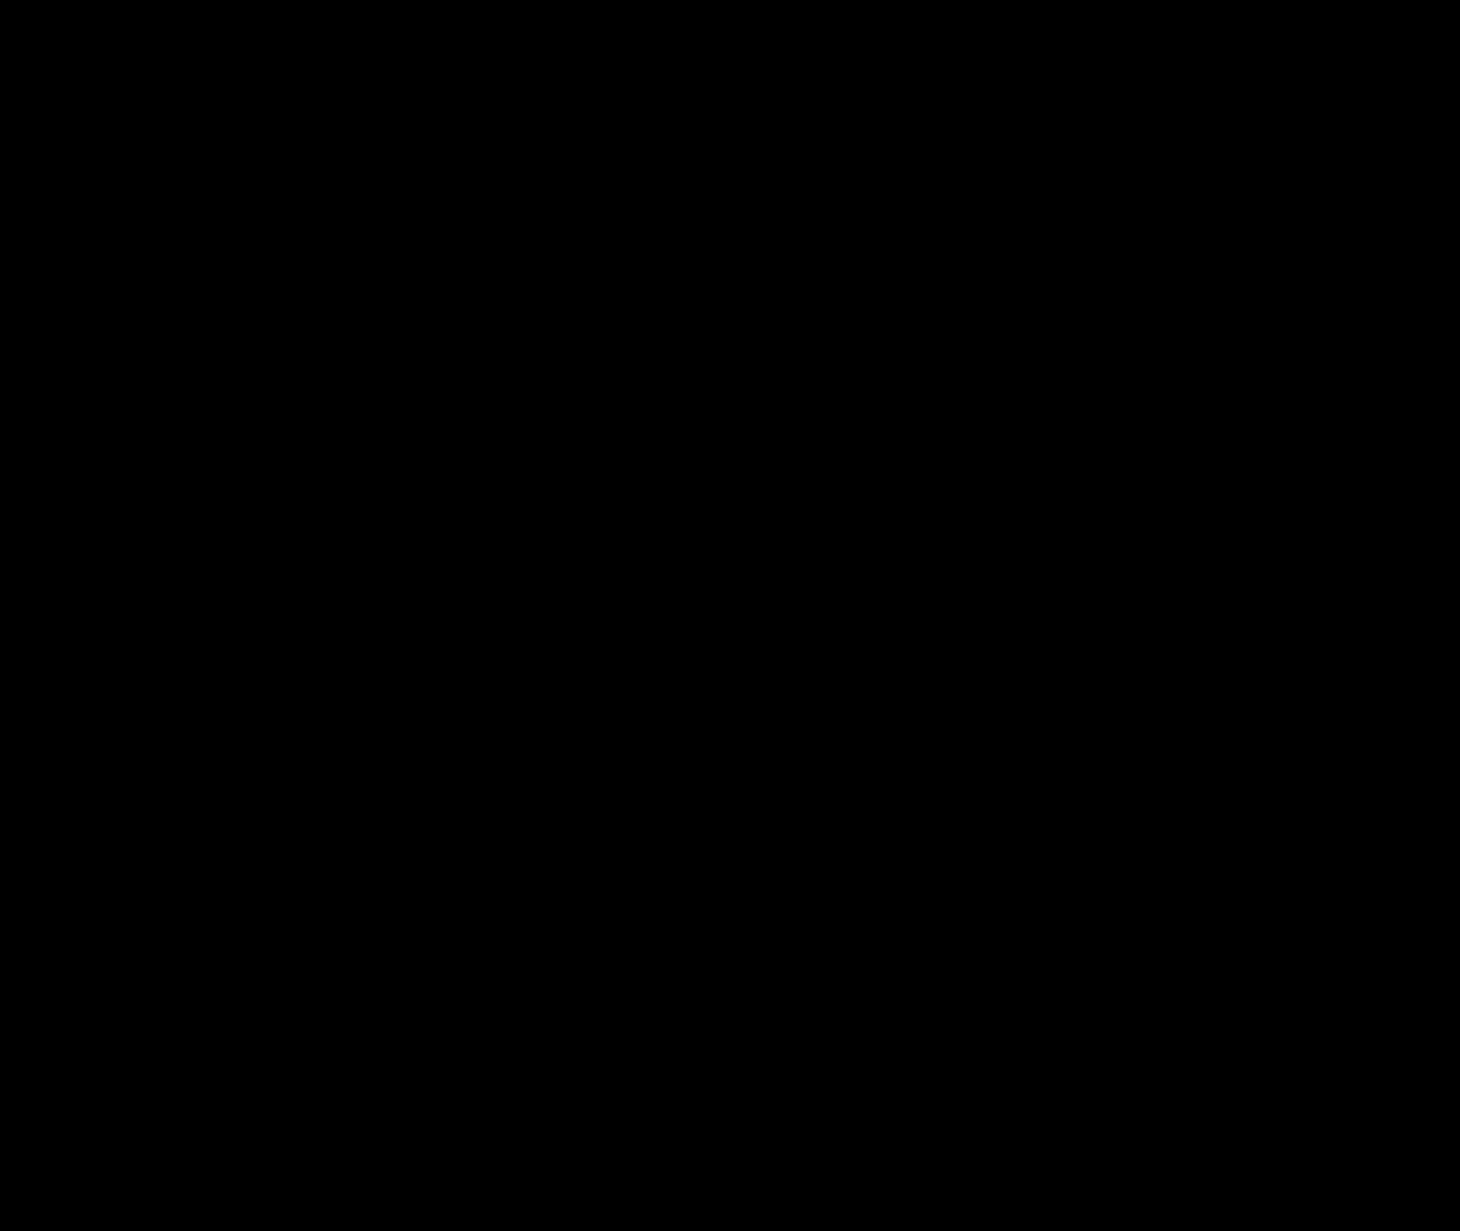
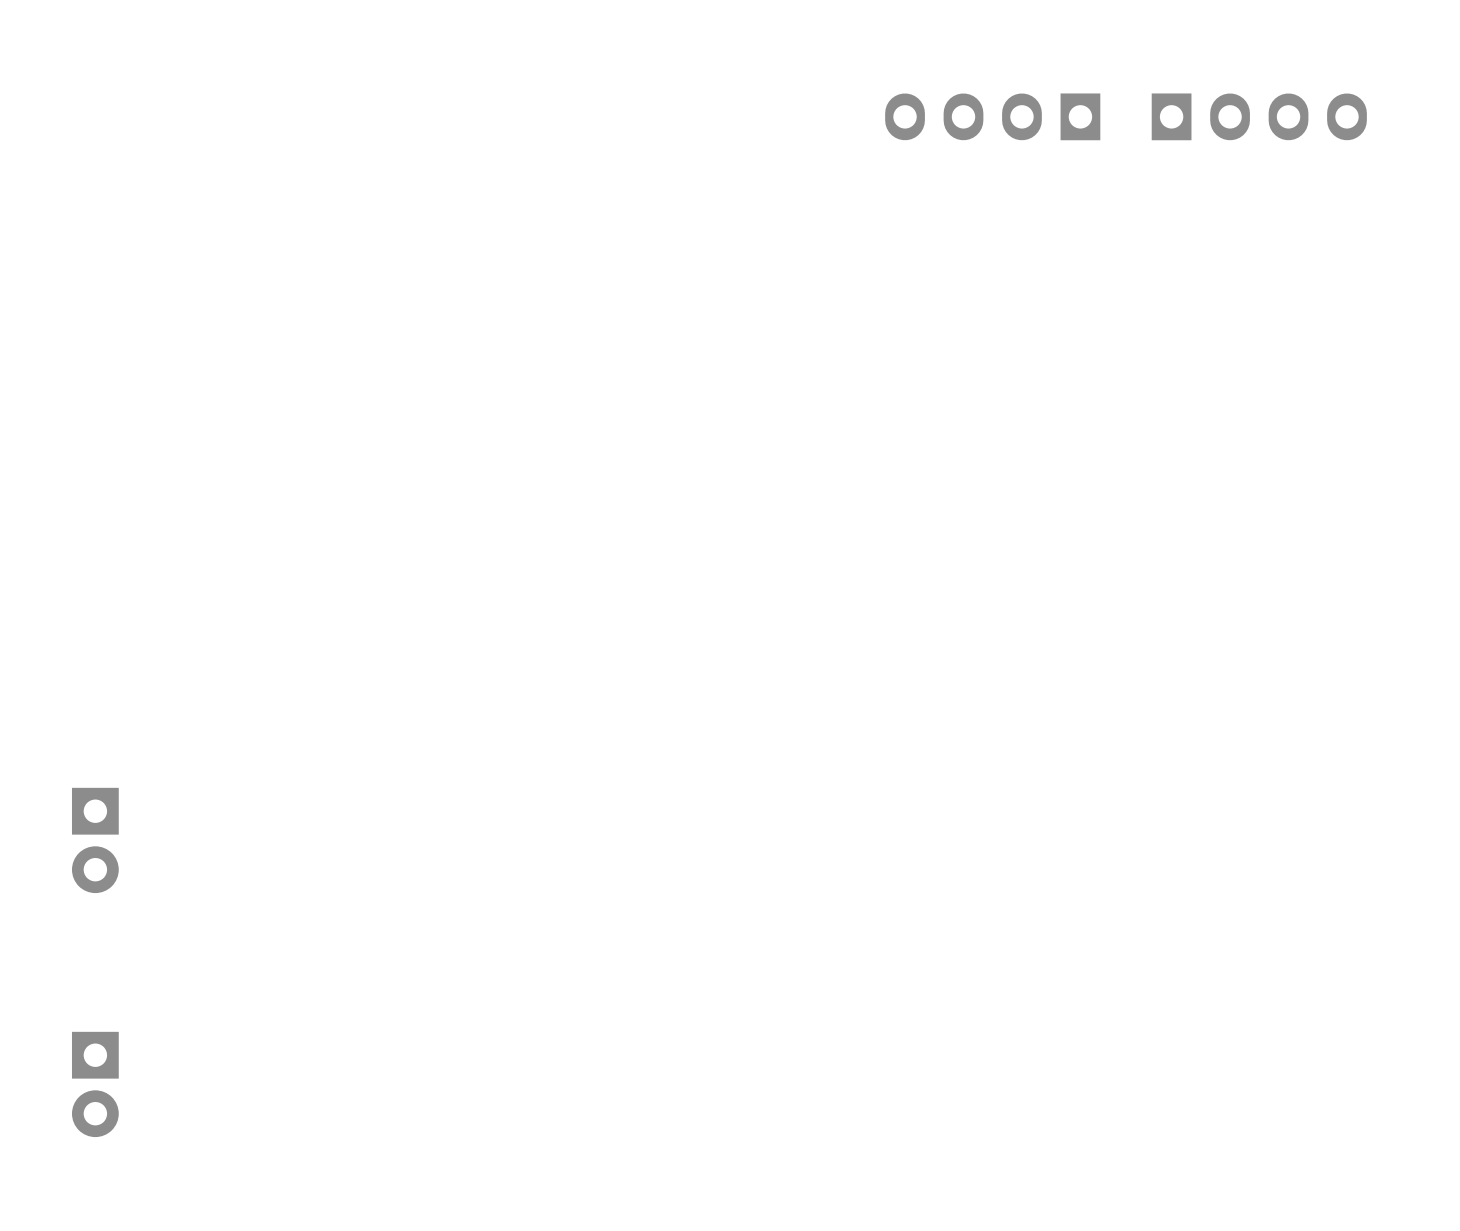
part: none -> (992, 116)
part: none -> (1259, 116)
part: none -> (95, 840)
part: none -> (95, 1084)

